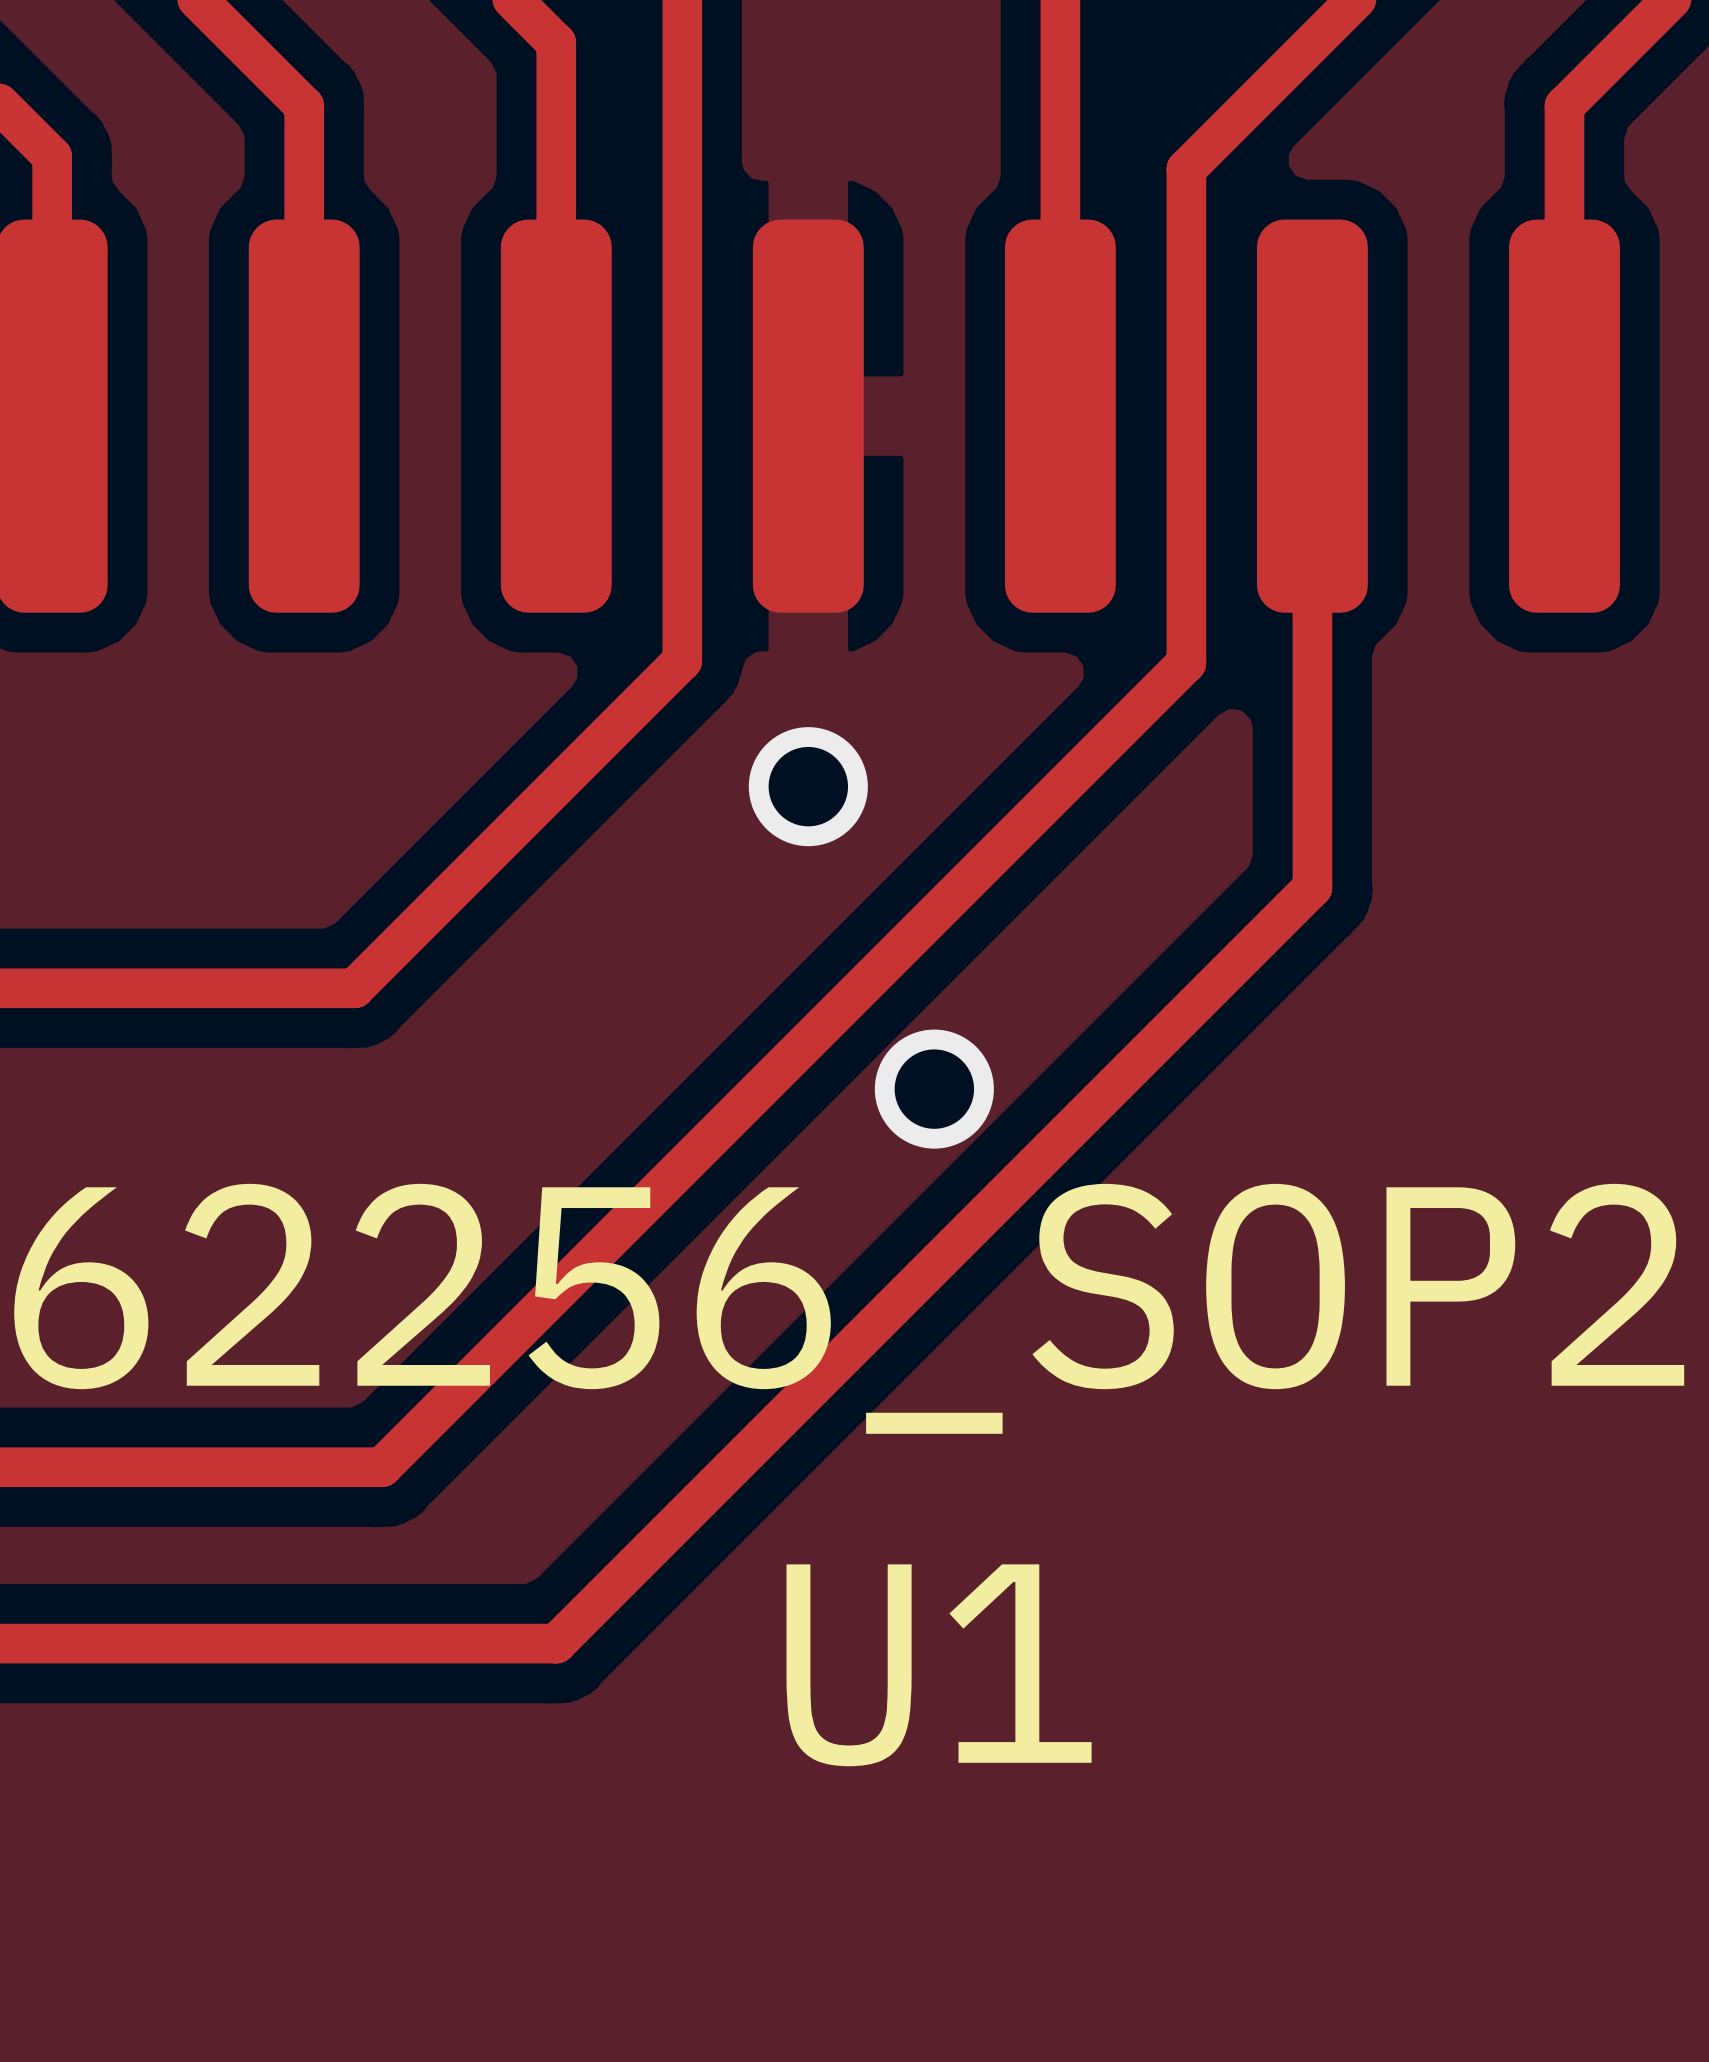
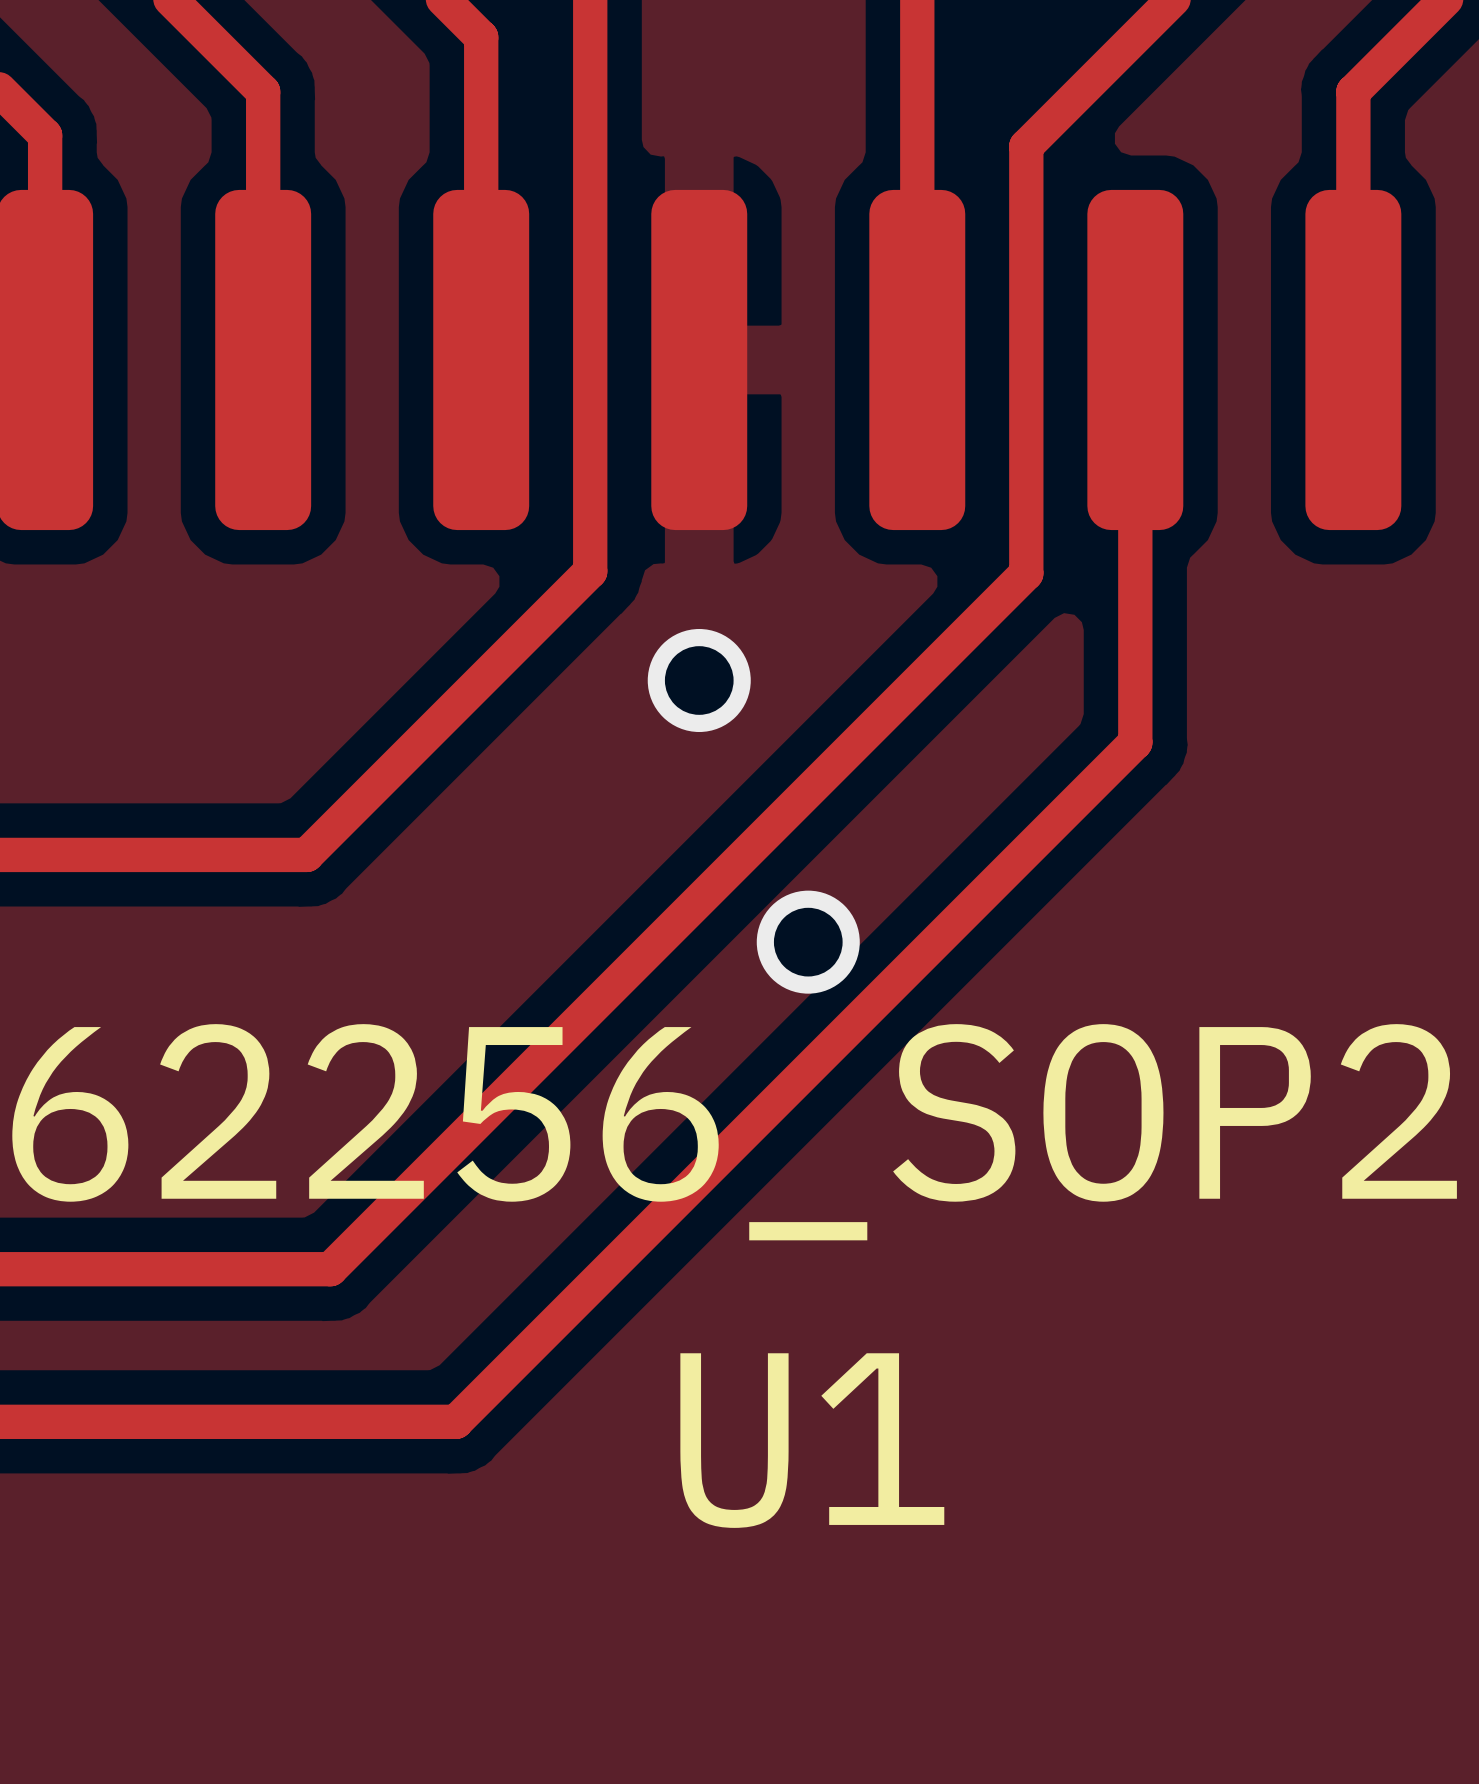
track: (1312, 858) (1312, 887) (556, 1643) (527, 1643) -> (1135, 742) (455, 1421)

